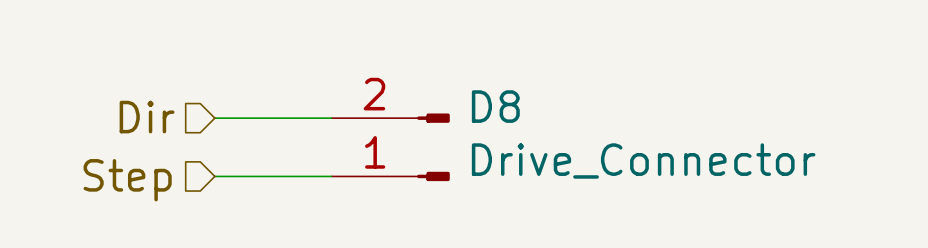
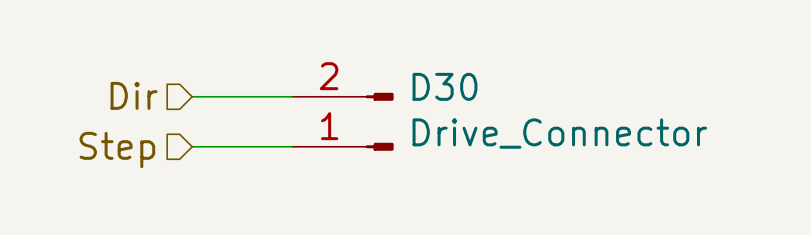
D8 name: D8 (495, 106) -> D30 (445, 86)

